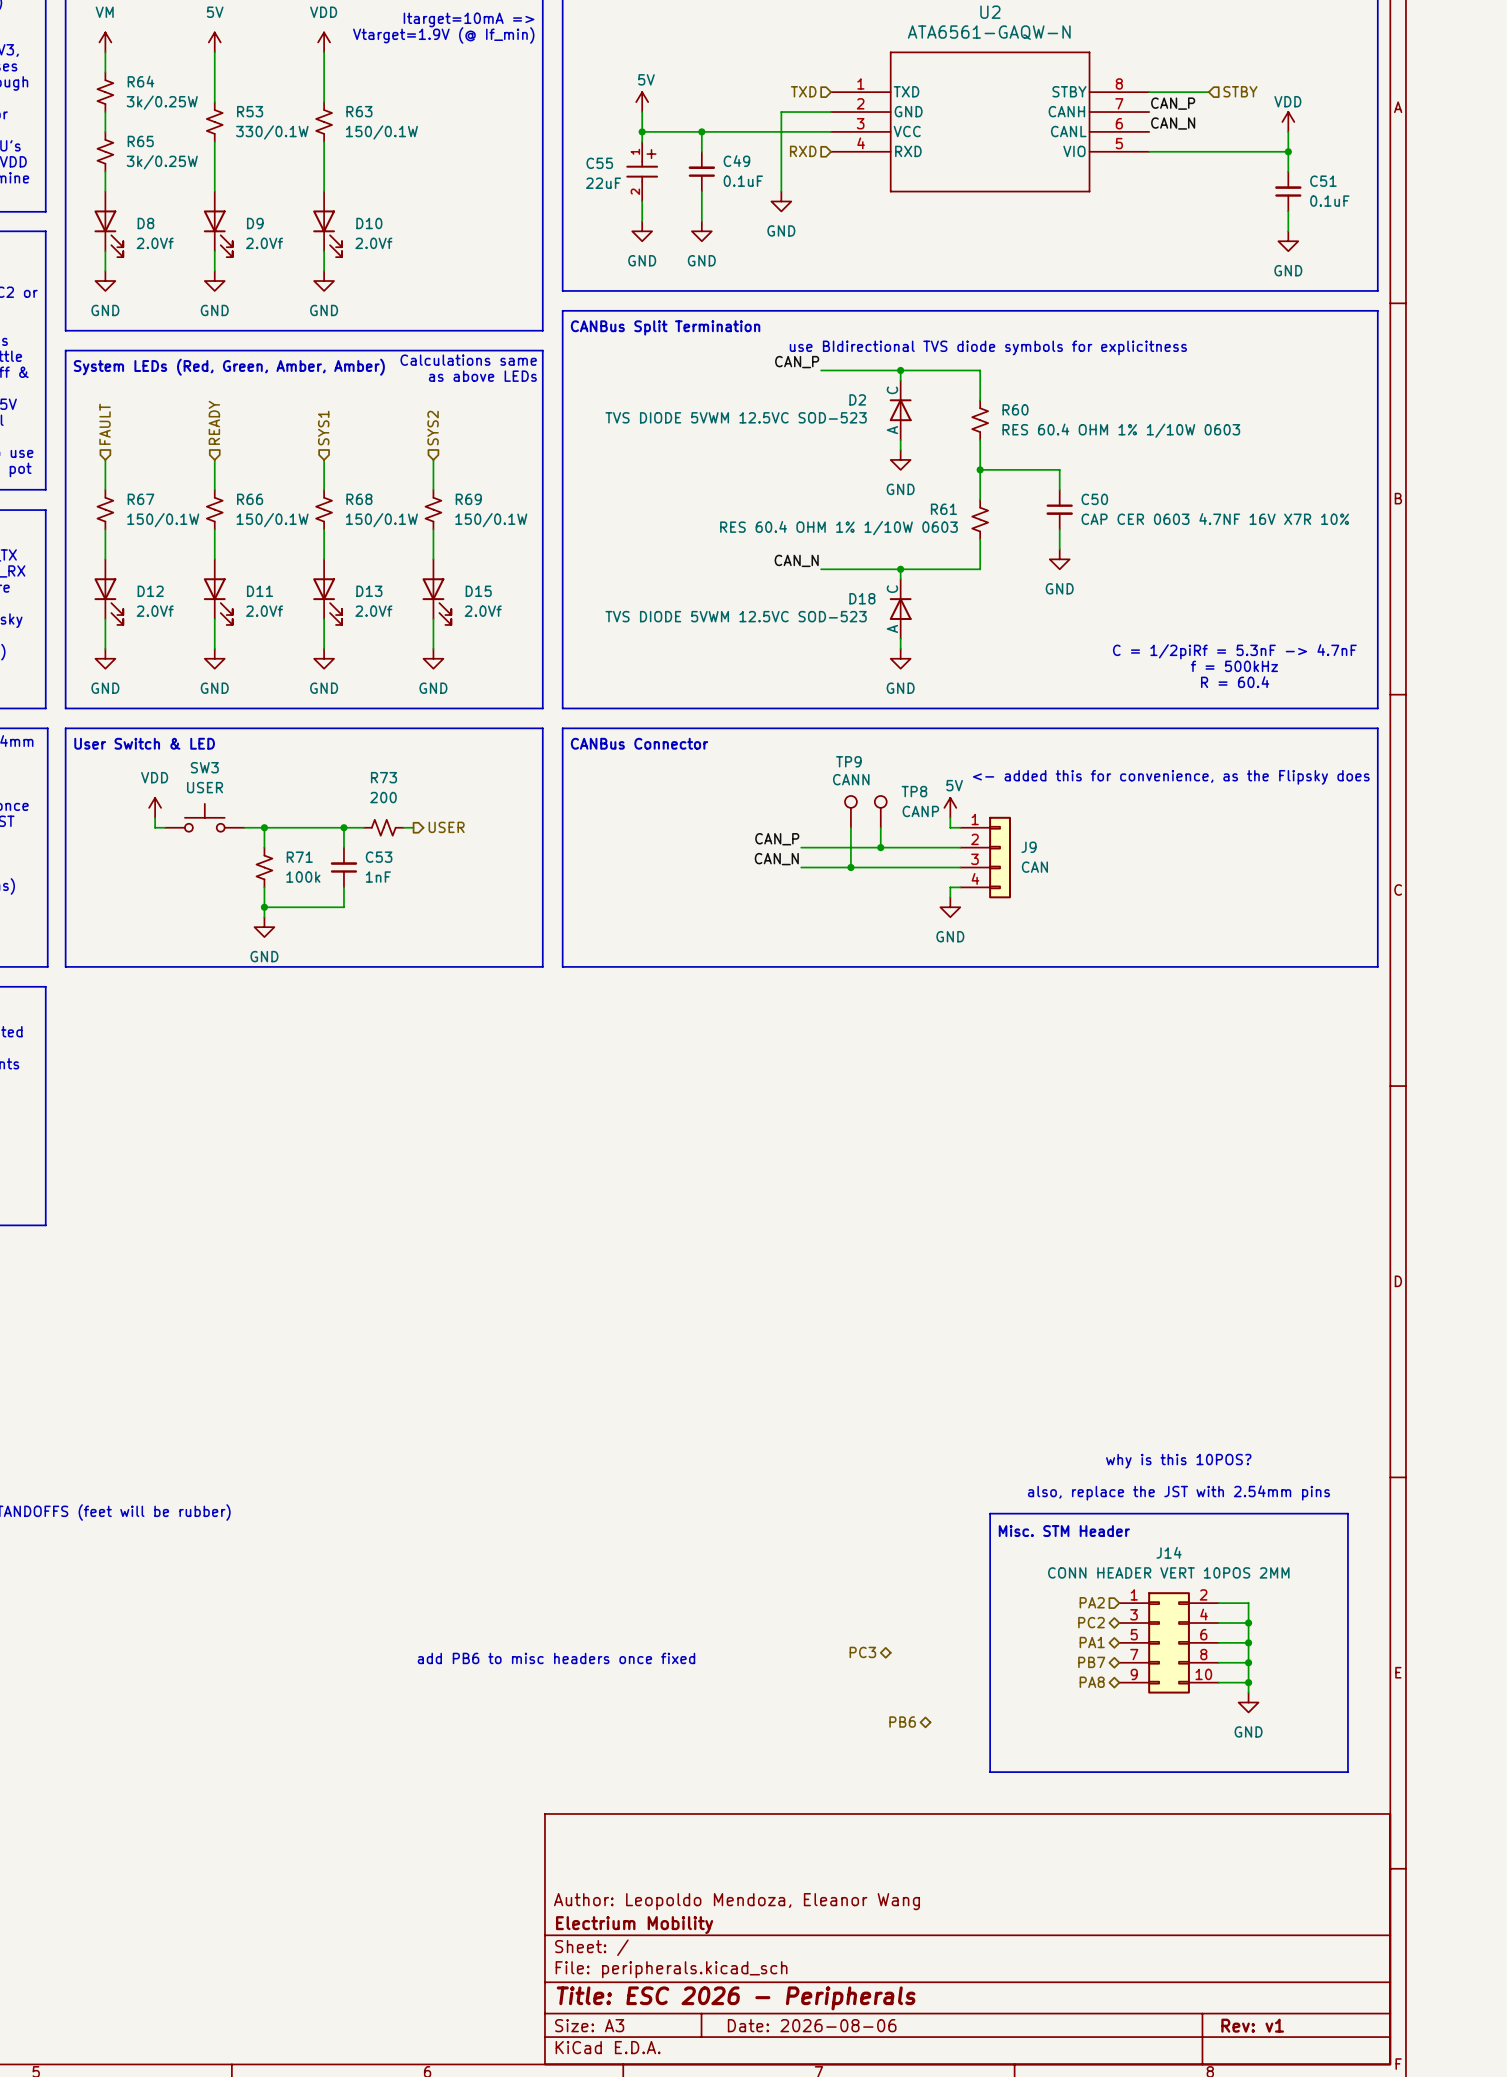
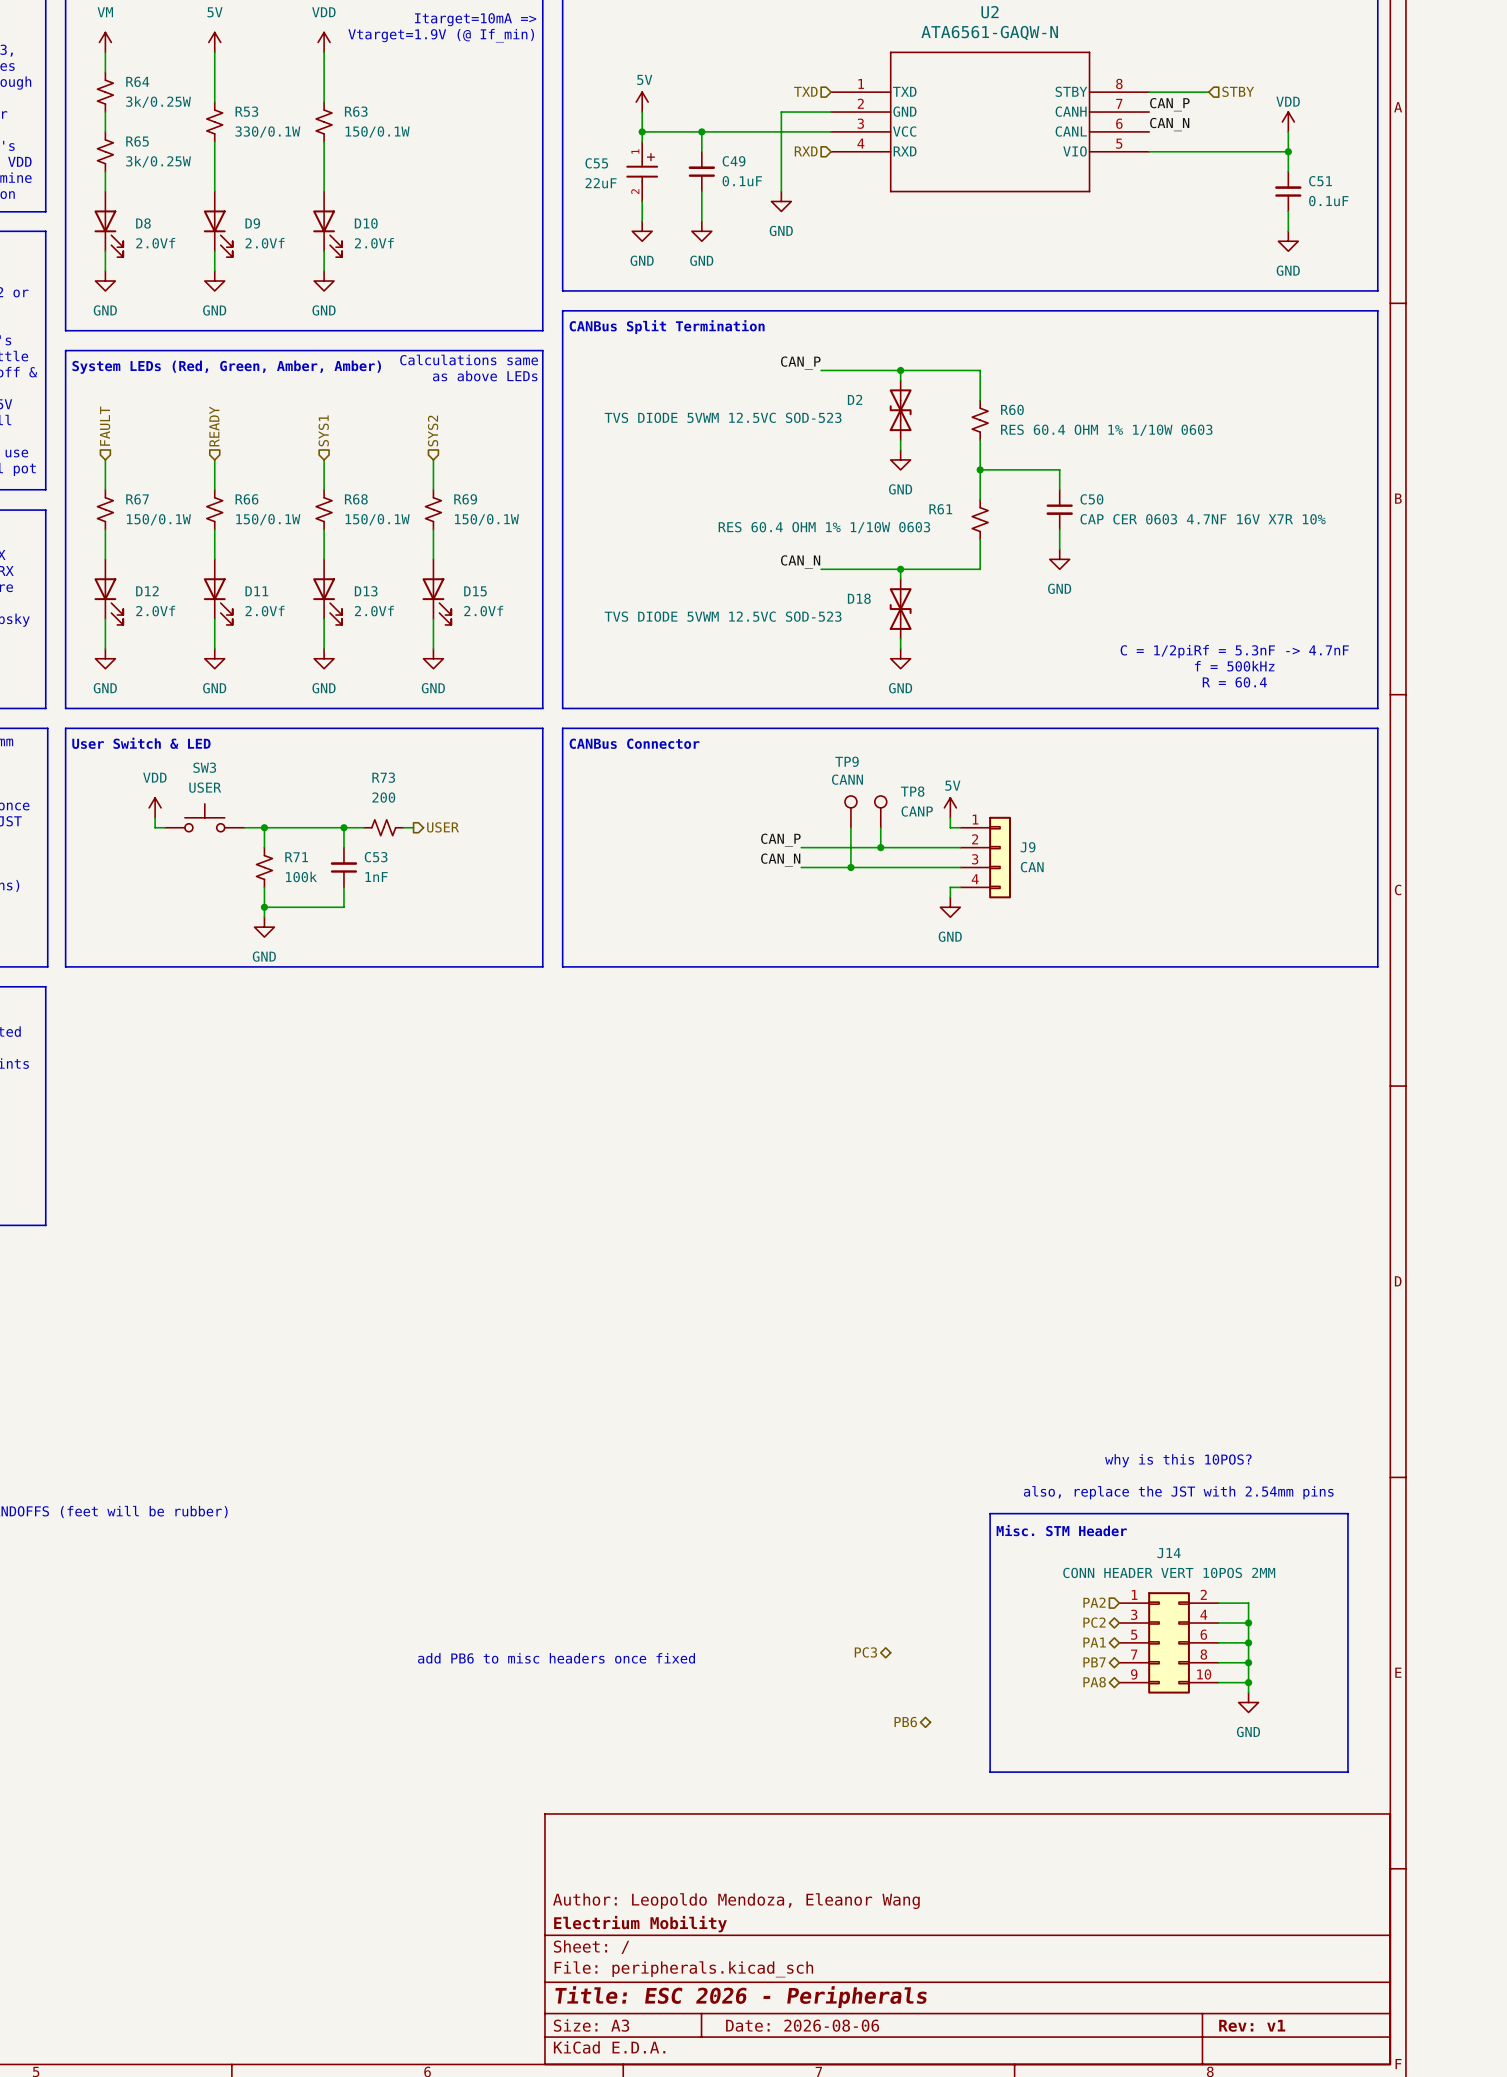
text: use BIdirectional TVS diode symbols for explicitness (988, 347) -> none
D2 symbol: [889, 380, 912, 441] -> [889, 380, 912, 441]
D18 symbol: [889, 579, 912, 639] -> [889, 579, 912, 639]
text: <- added this for convenience, as the Flipsky does (1171, 777) -> none

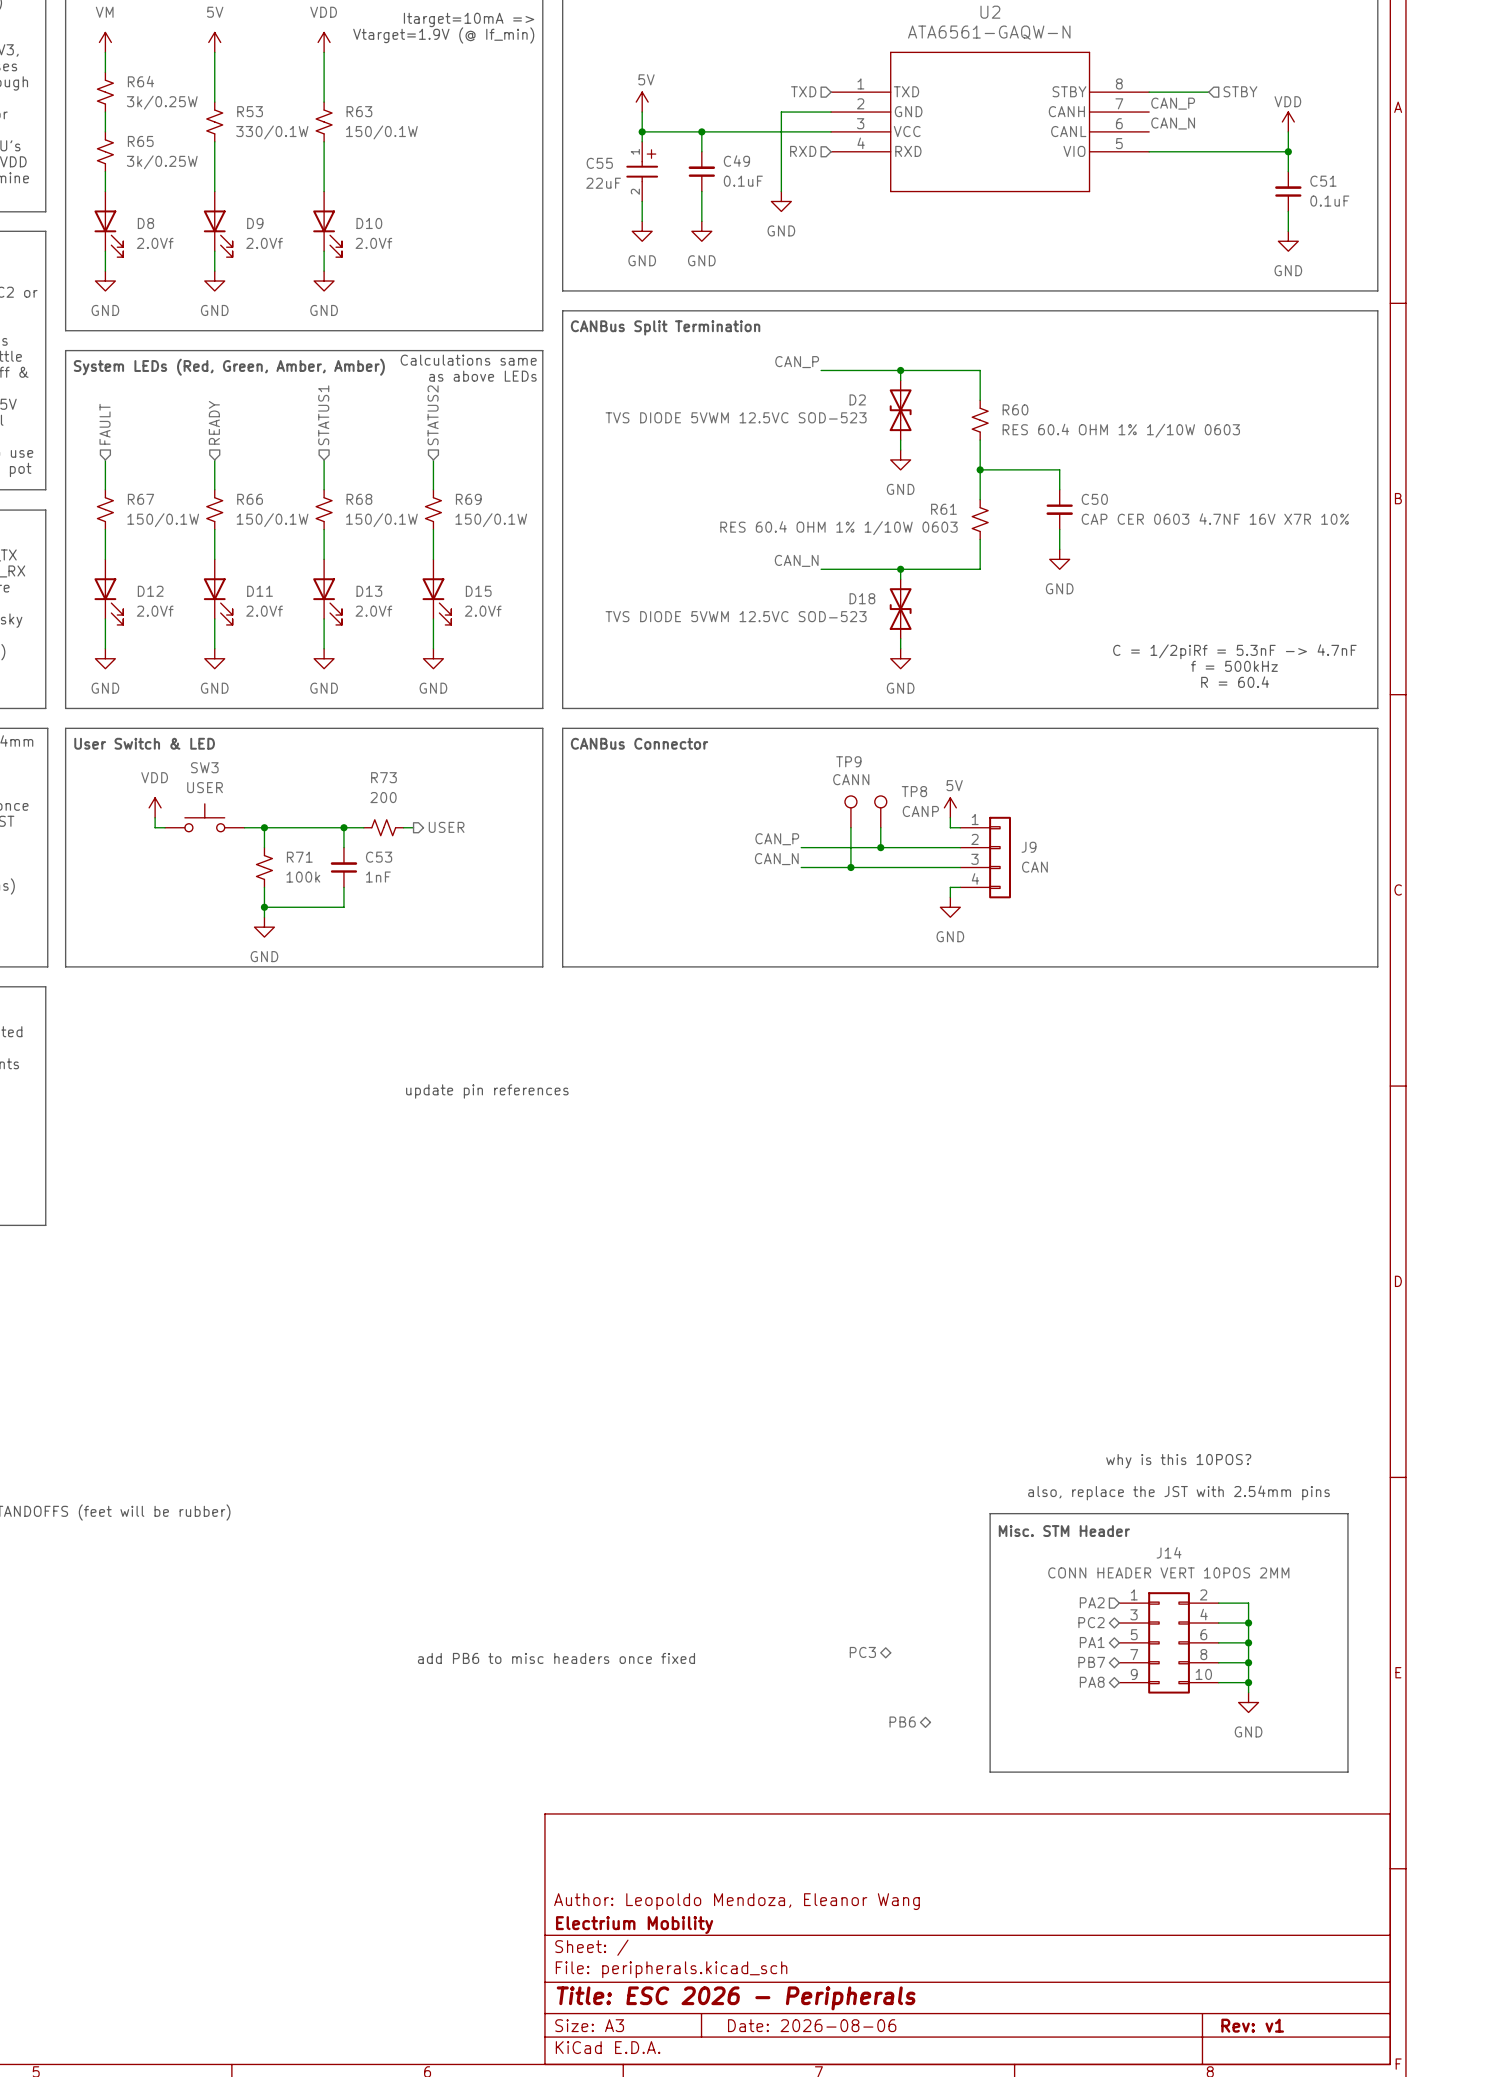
hierarchical label: SYS1 (323, 430) -> STATUS1 (323, 415)
hierarchical label: SYS2 (433, 431) -> STATUS2 (433, 415)
text: none -> update pin references (487, 1091)

